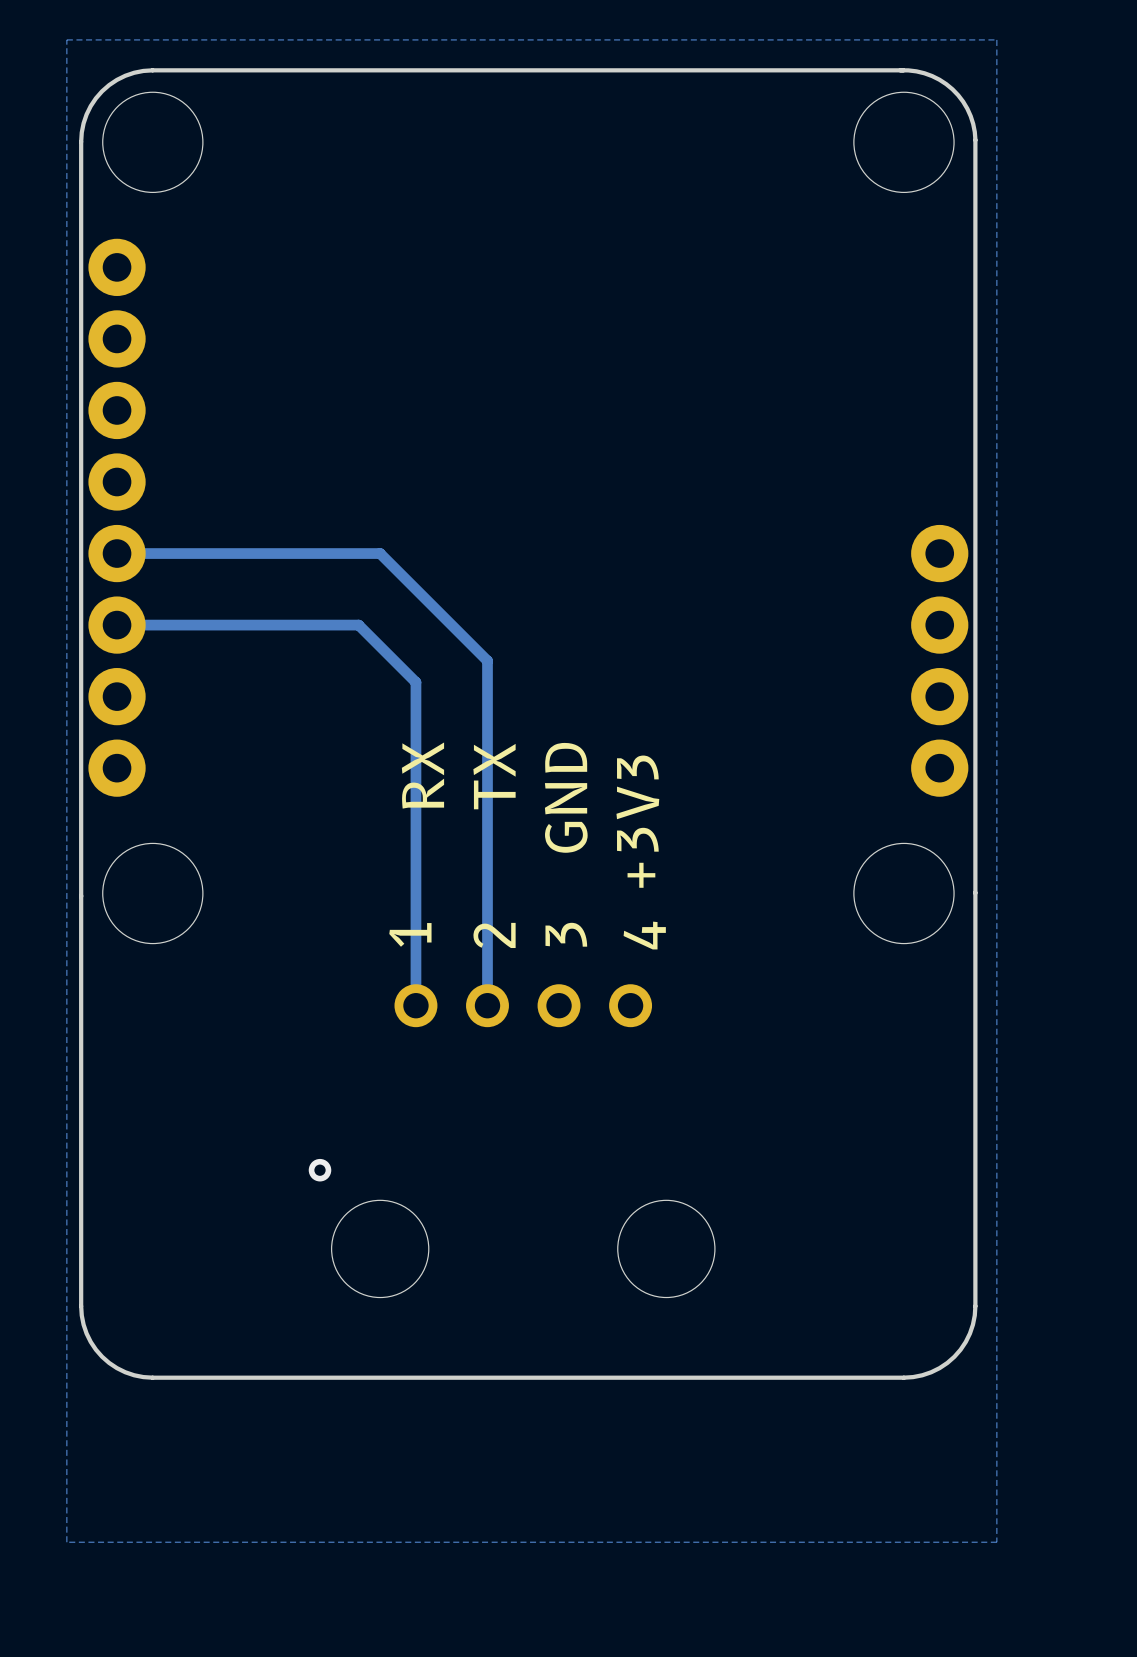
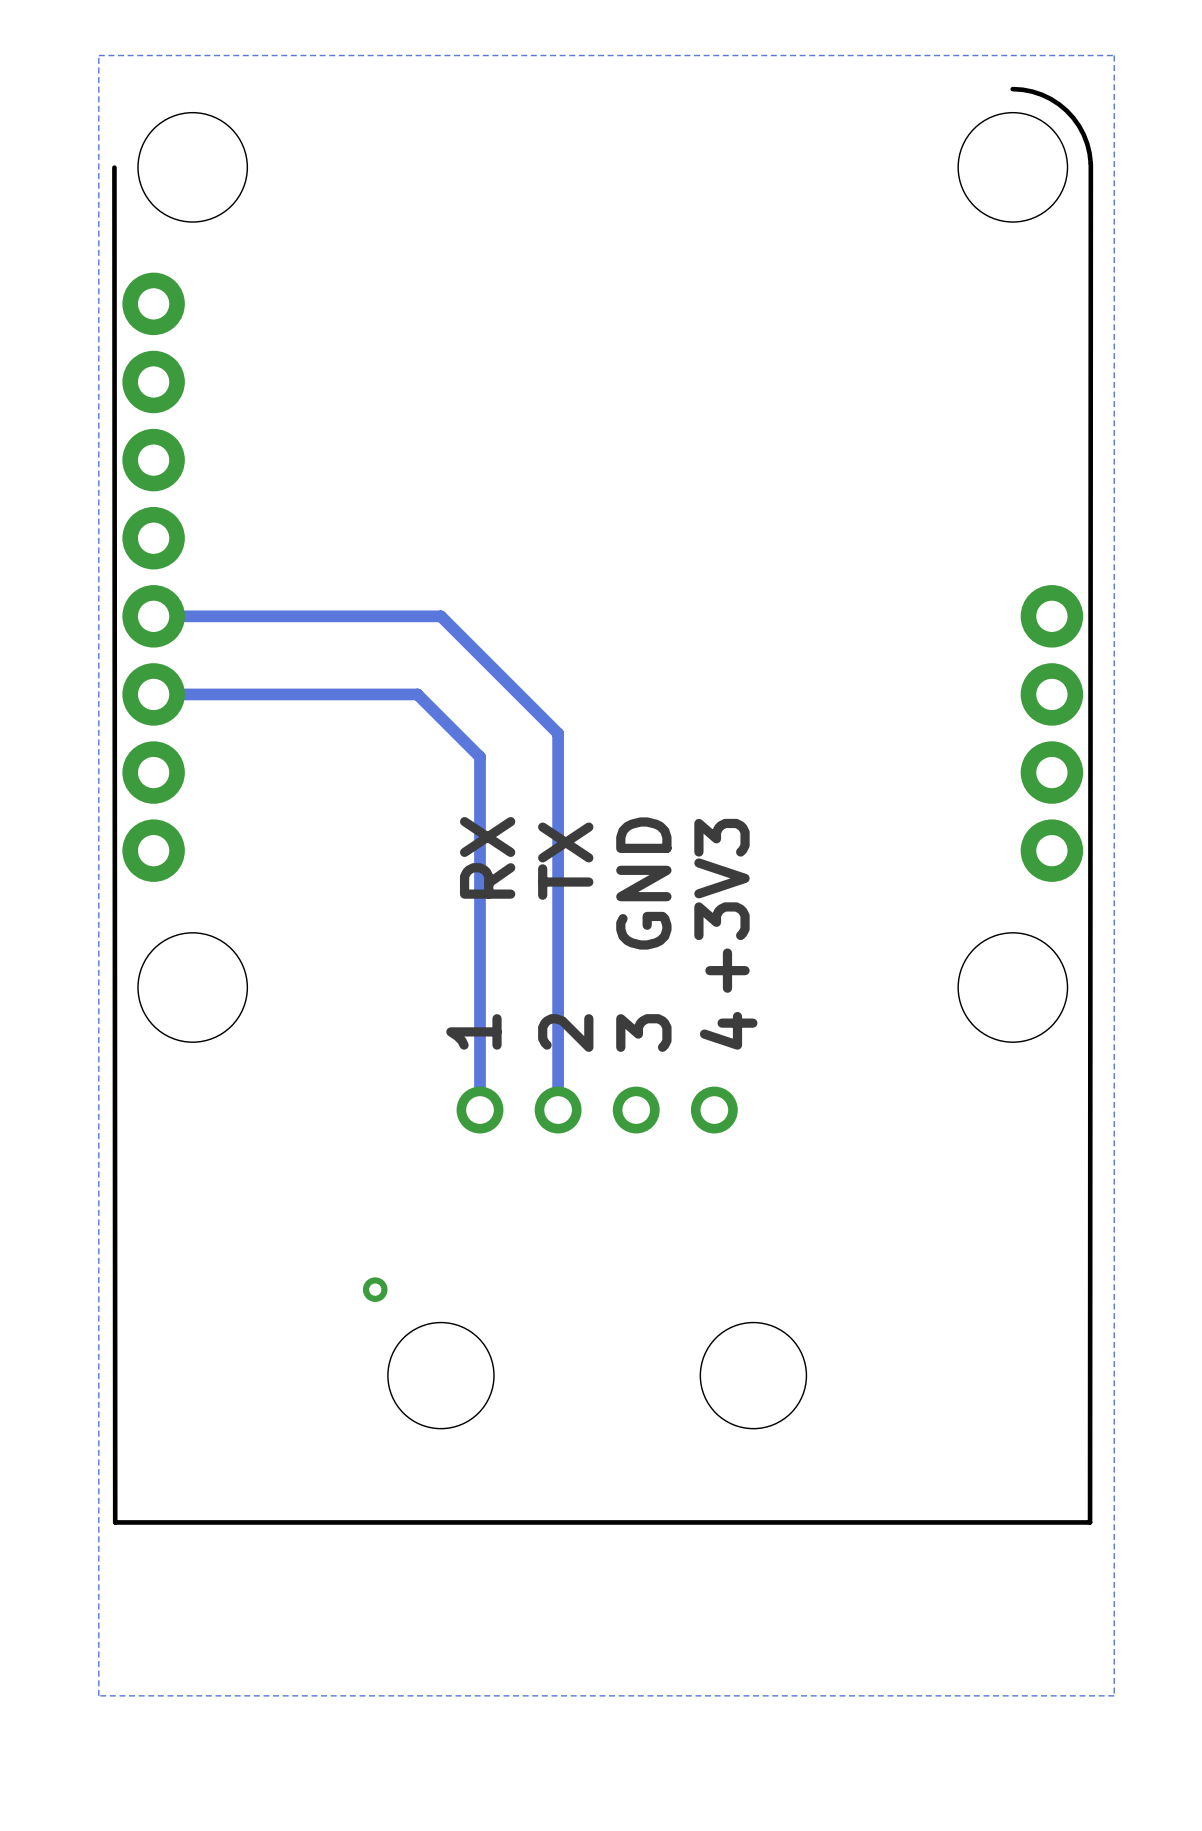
board edge: (903, 70) (152, 70) (134, 72) (116, 79) (102, 91) (90, 106) (83, 123) (81, 141) (81, 1306) (83, 1324) (90, 1341) (102, 1356) (116, 1368) (134, 1375) (152, 1377) (903, 1377) (922, 1375) (939, 1368) (954, 1356) (965, 1341) (972, 1324) (975, 1306) (975, 140) (970, 116) (963, 101) (952, 89) (939, 79) (924, 73) (916, 71) (908, 70) (900, 70) -> (1012, 89) (1041, 94) (1066, 110) (1083, 134) (1090, 163)
board edge: none -> (1090, 164) (1090, 1522) (115, 1522) (114, 167)

